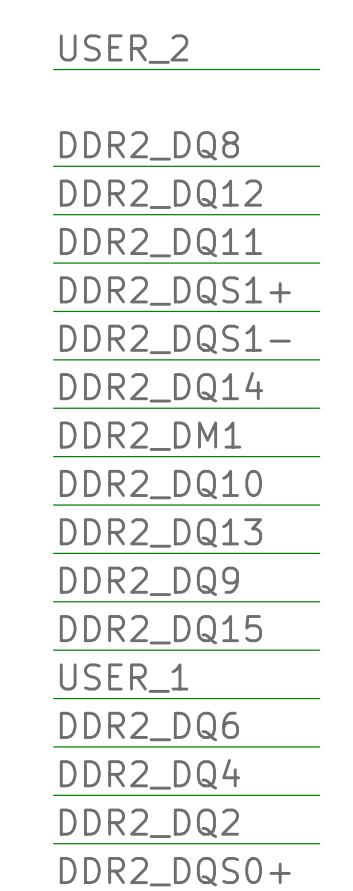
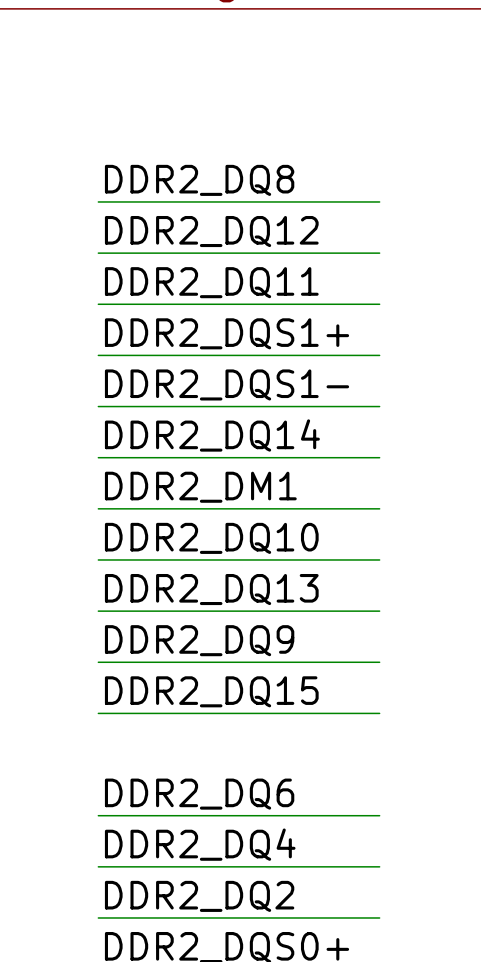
label: USER_2 (124, 49) -> none
wire: (53, 69) (319, 69) -> none
label: USER_1 (124, 678) -> none
wire: (53, 698) (319, 698) -> none

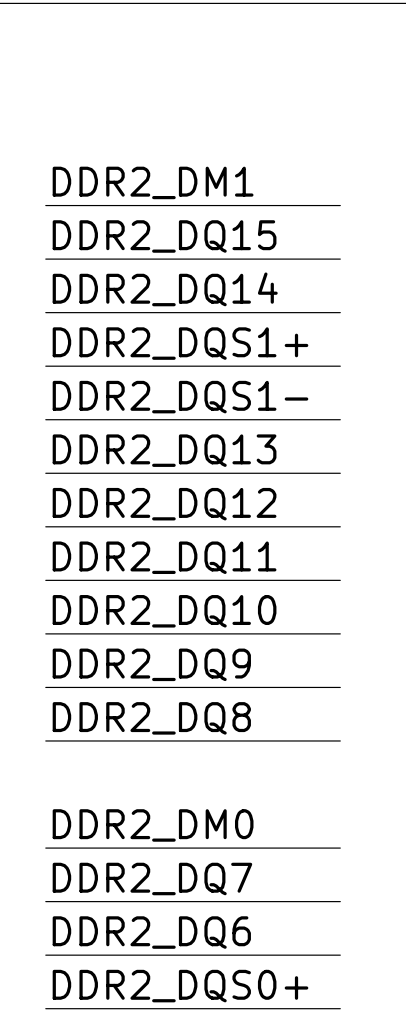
label: DDR2_DQ8 (199, 180) -> DDR2_DM1 (153, 182)
label: DDR2_DQ12 (211, 231) -> DDR2_DQ15 (164, 236)
label: DDR2_DQ11 (211, 282) -> DDR2_DQ14 (165, 289)
label: DDR2_DQ14 (212, 435) -> DDR2_DQ13 (164, 450)
label: DDR2_DM1 (200, 487) -> DDR2_DQ12 (164, 504)
label: DDR2_DQ10 (211, 538) -> DDR2_DQ11 (164, 557)
label: DDR2_DQ13 (211, 589) -> DDR2_DQ10 (164, 611)
label: DDR2_DQ15 (211, 691) -> DDR2_DQ8 (151, 718)
label: DDR2_DQ6 (199, 794) -> DDR2_DM0 (153, 825)
label: DDR2_DQ4 (200, 844) -> DDR2_DQ7 (152, 879)
label: DDR2_DQ2 (199, 896) -> DDR2_DQ6 (151, 932)

